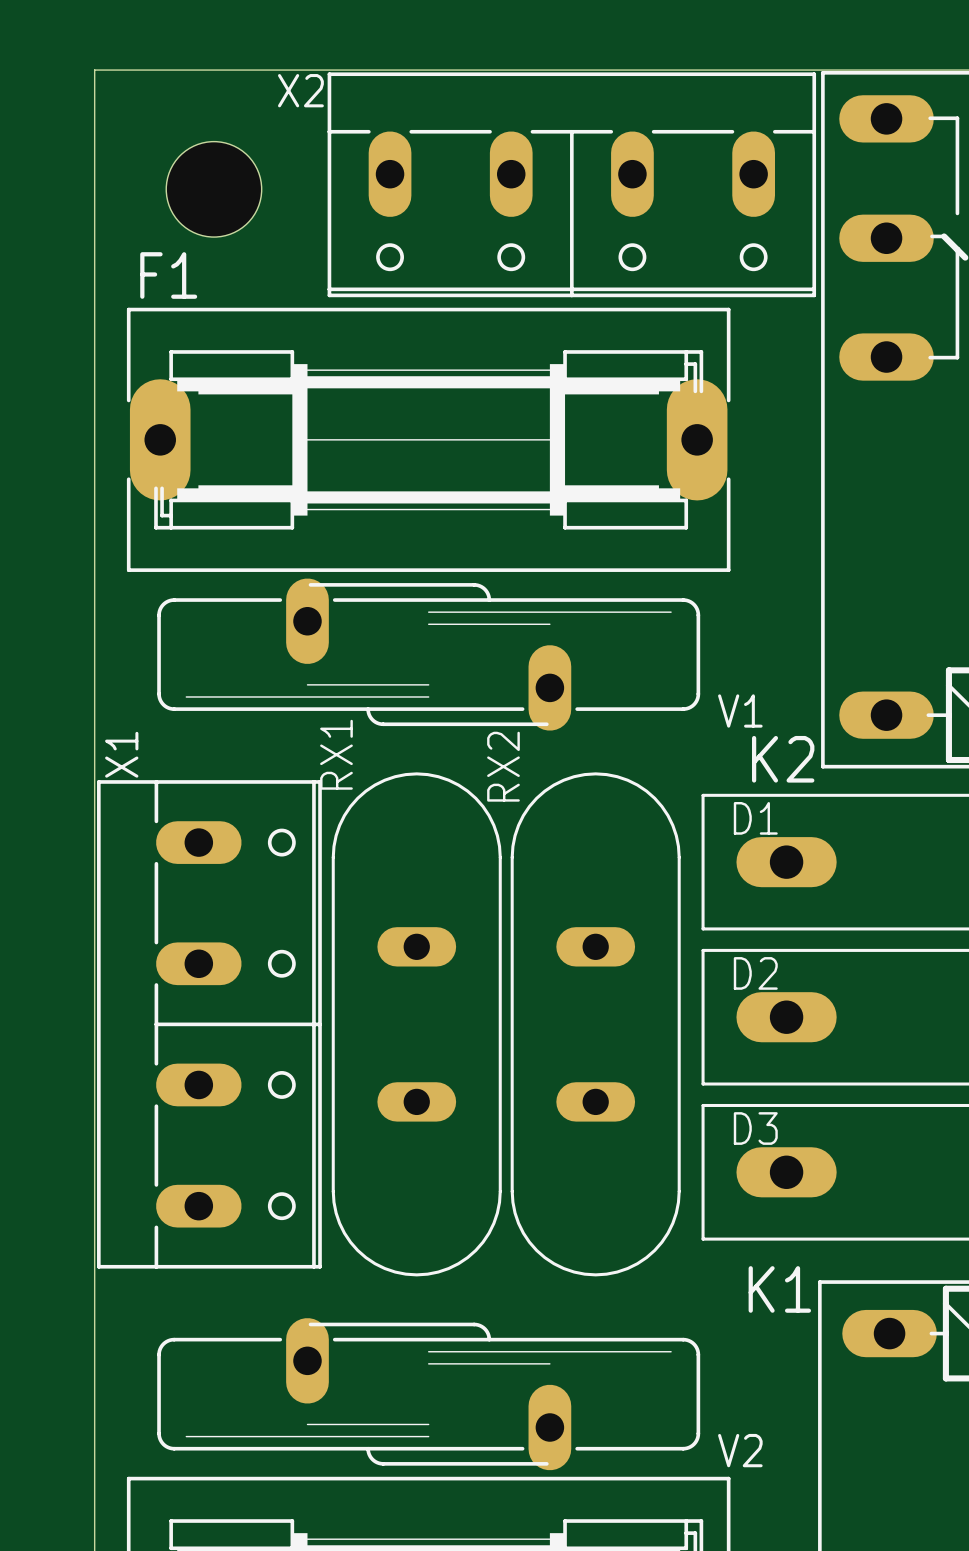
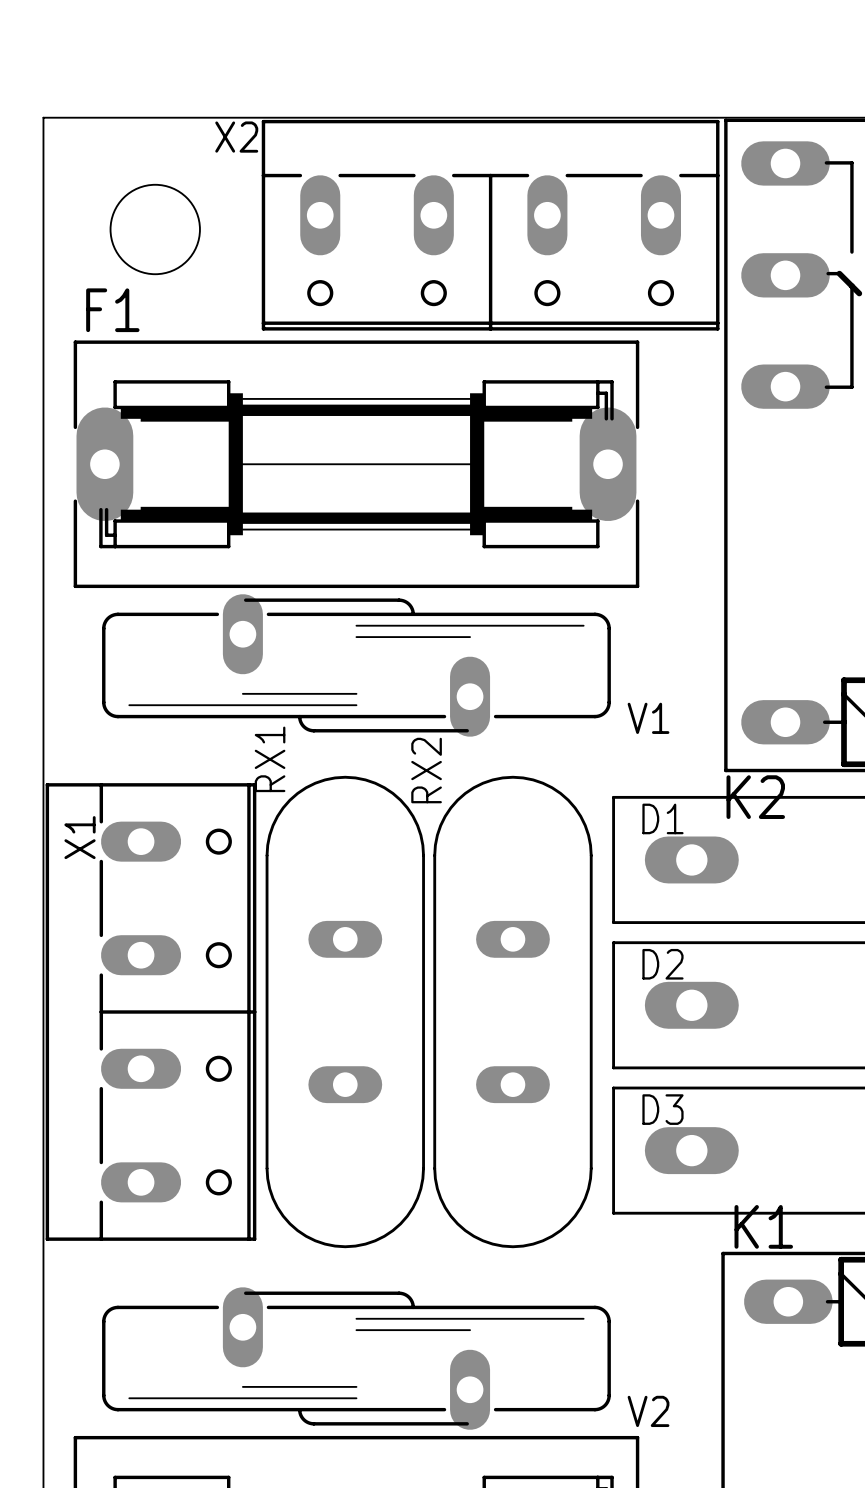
X1 name position: X1 (121, 754) -> X1 (80, 837)
K2 name position: K2 (783, 759) -> K2 (755, 797)
K1 name position: K1 (779, 1289) -> K1 (763, 1226)

